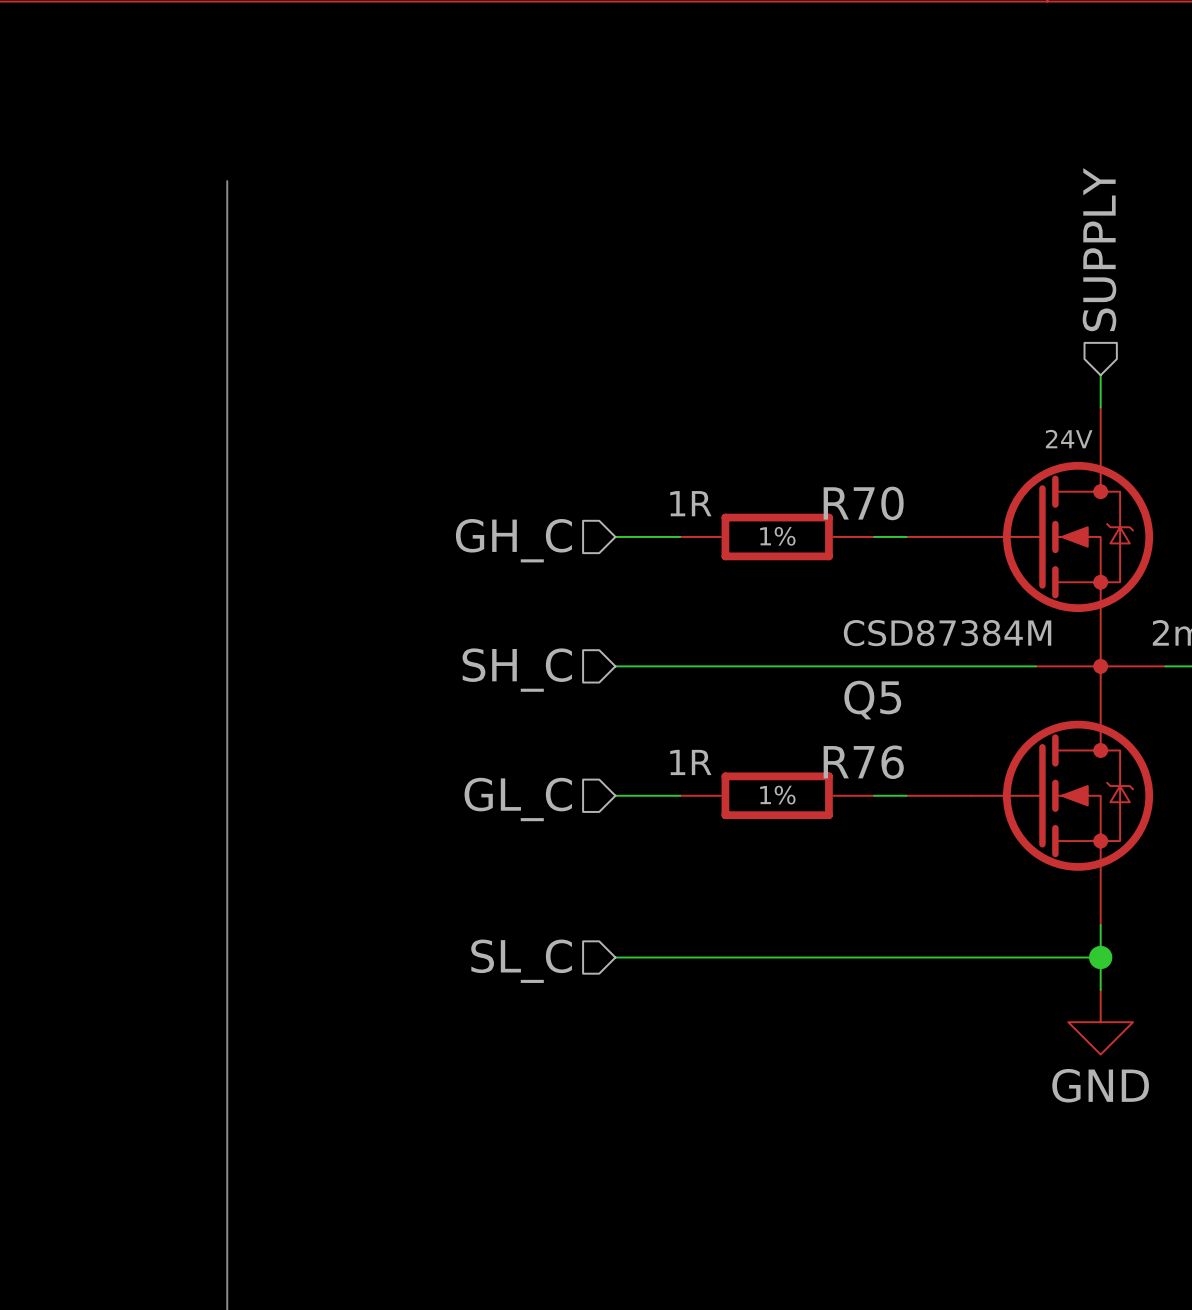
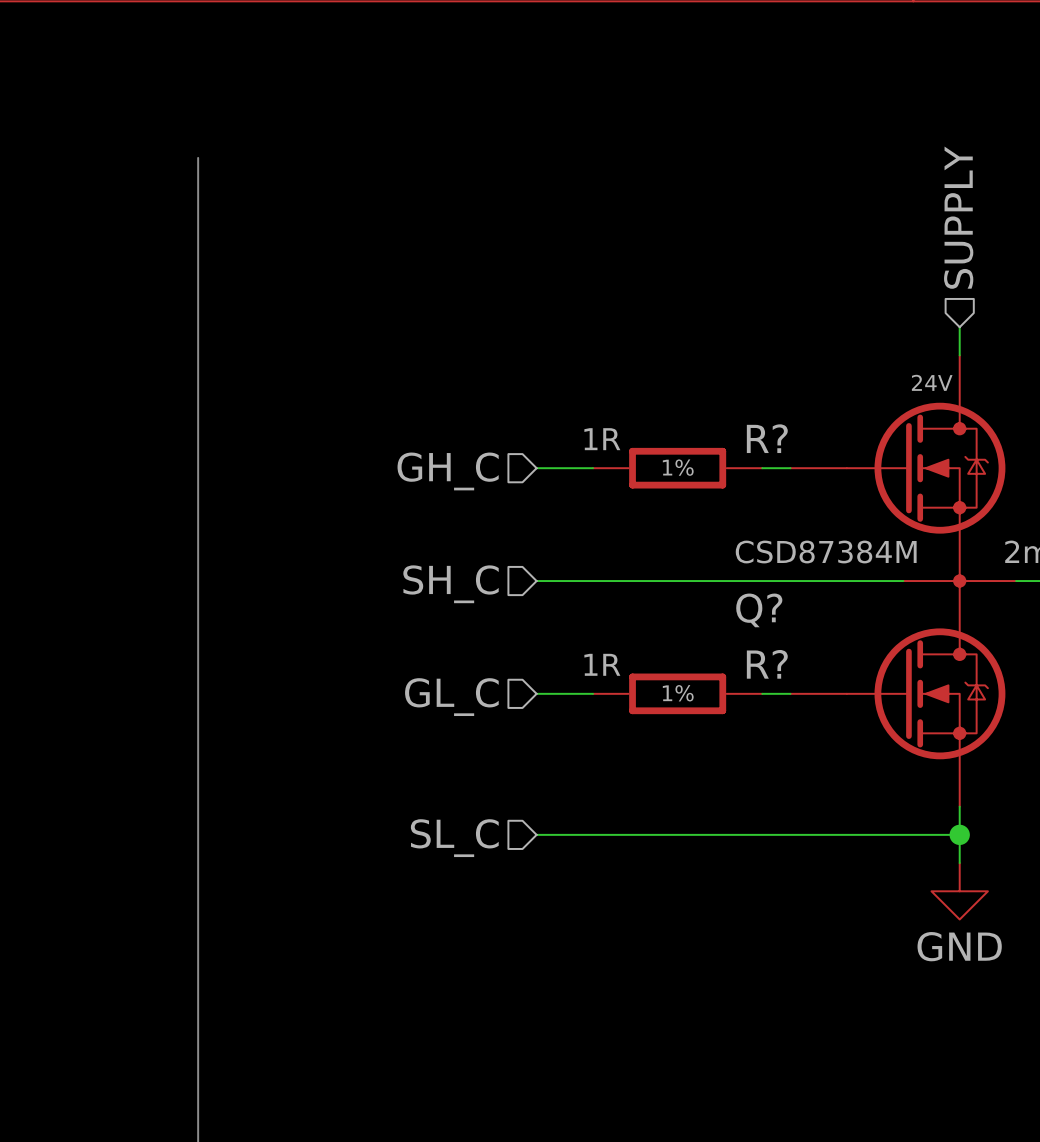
R70 name: R70 (863, 503) -> R? (767, 438)
Q5 name: Q5 (872, 700) -> Q? (759, 610)
R76 name: R76 (863, 762) -> R? (767, 664)

